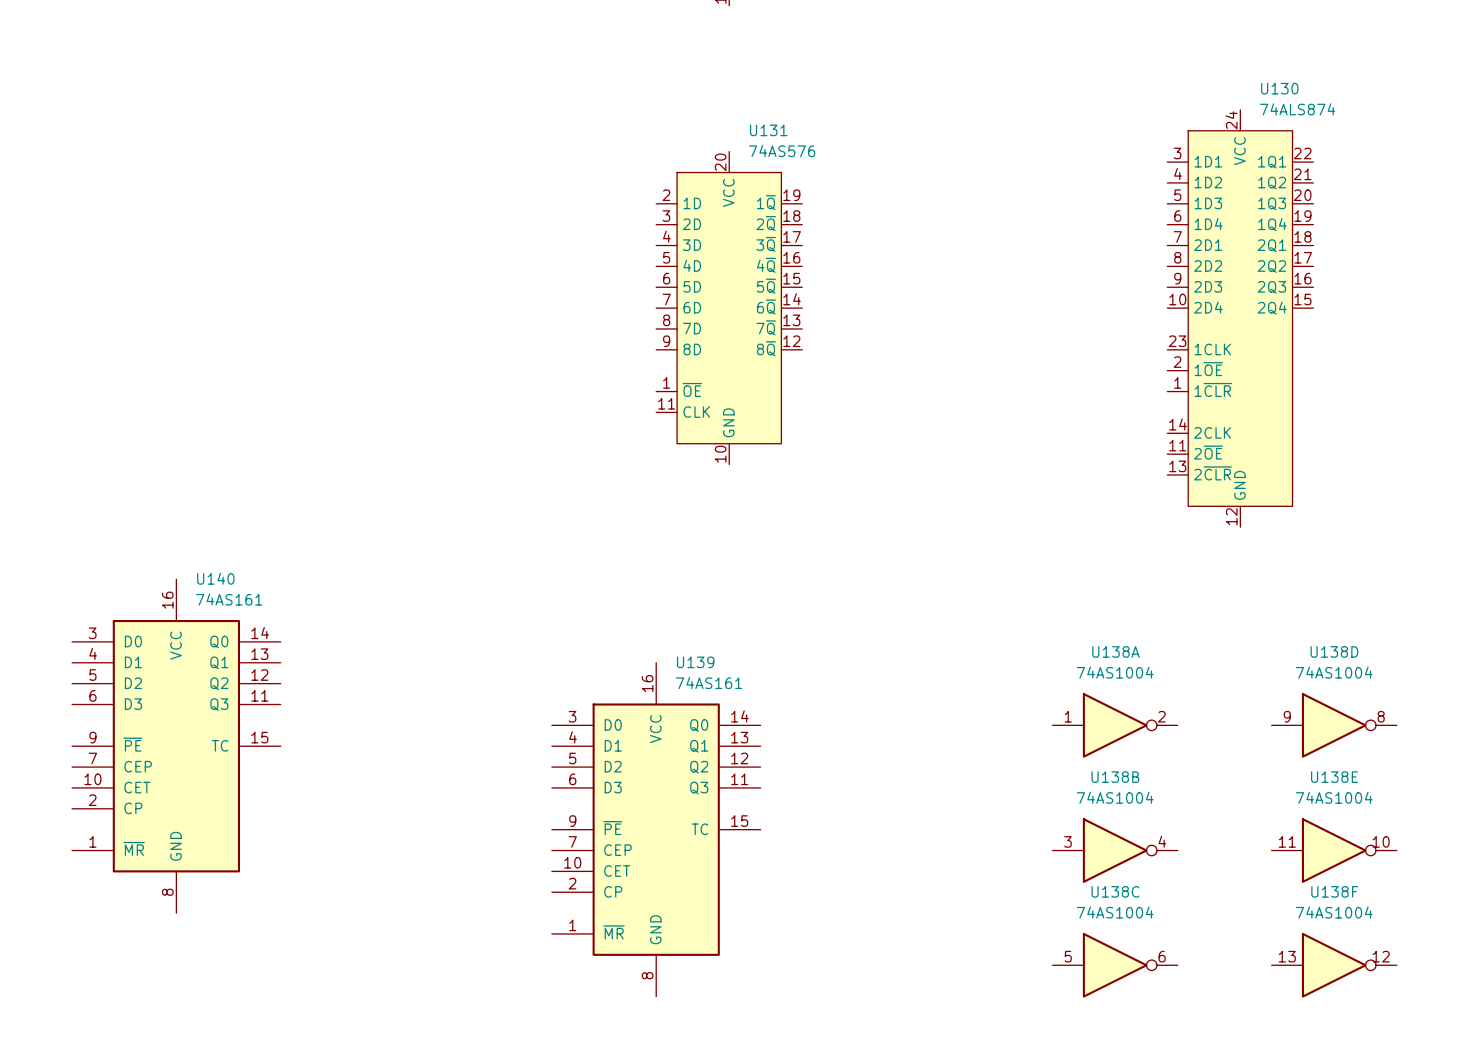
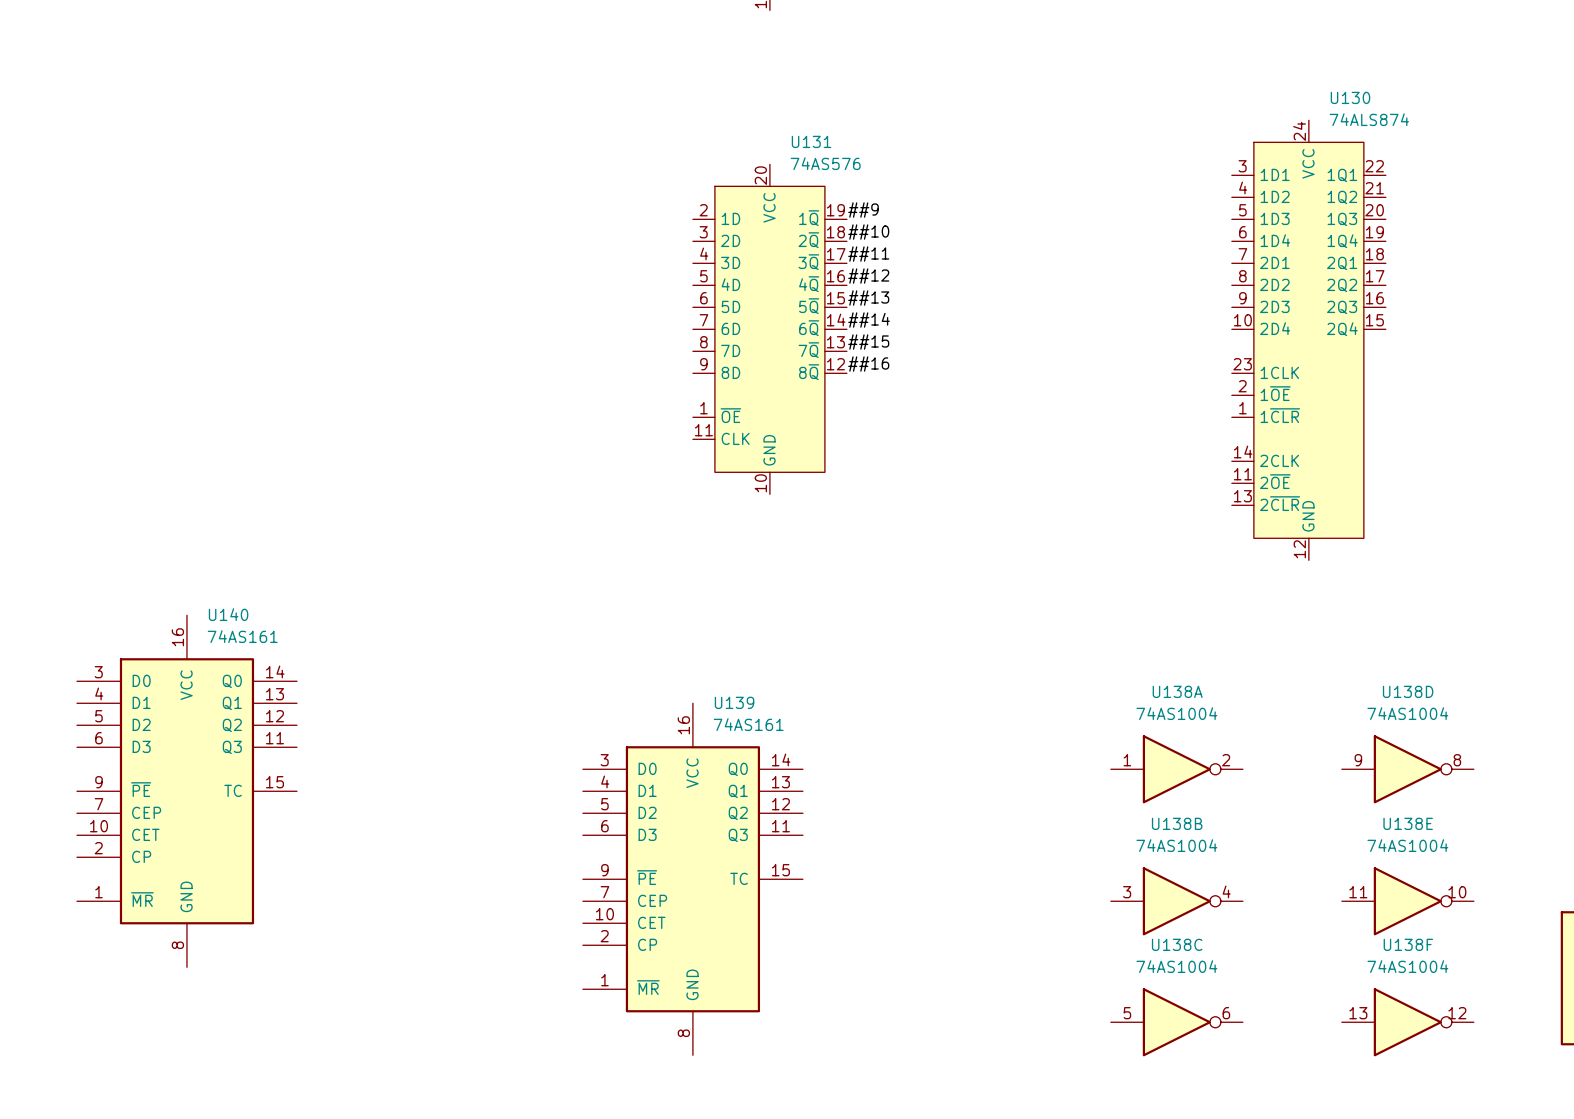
label: none -> ##9 (863, 210)
label: none -> ##10 (868, 232)
label: none -> ##11 (868, 254)
label: none -> ##12 (868, 276)
label: none -> ##13 (868, 298)
label: none -> ##14 (868, 320)
label: none -> ##15 (868, 342)
label: none -> ##16 (868, 364)

